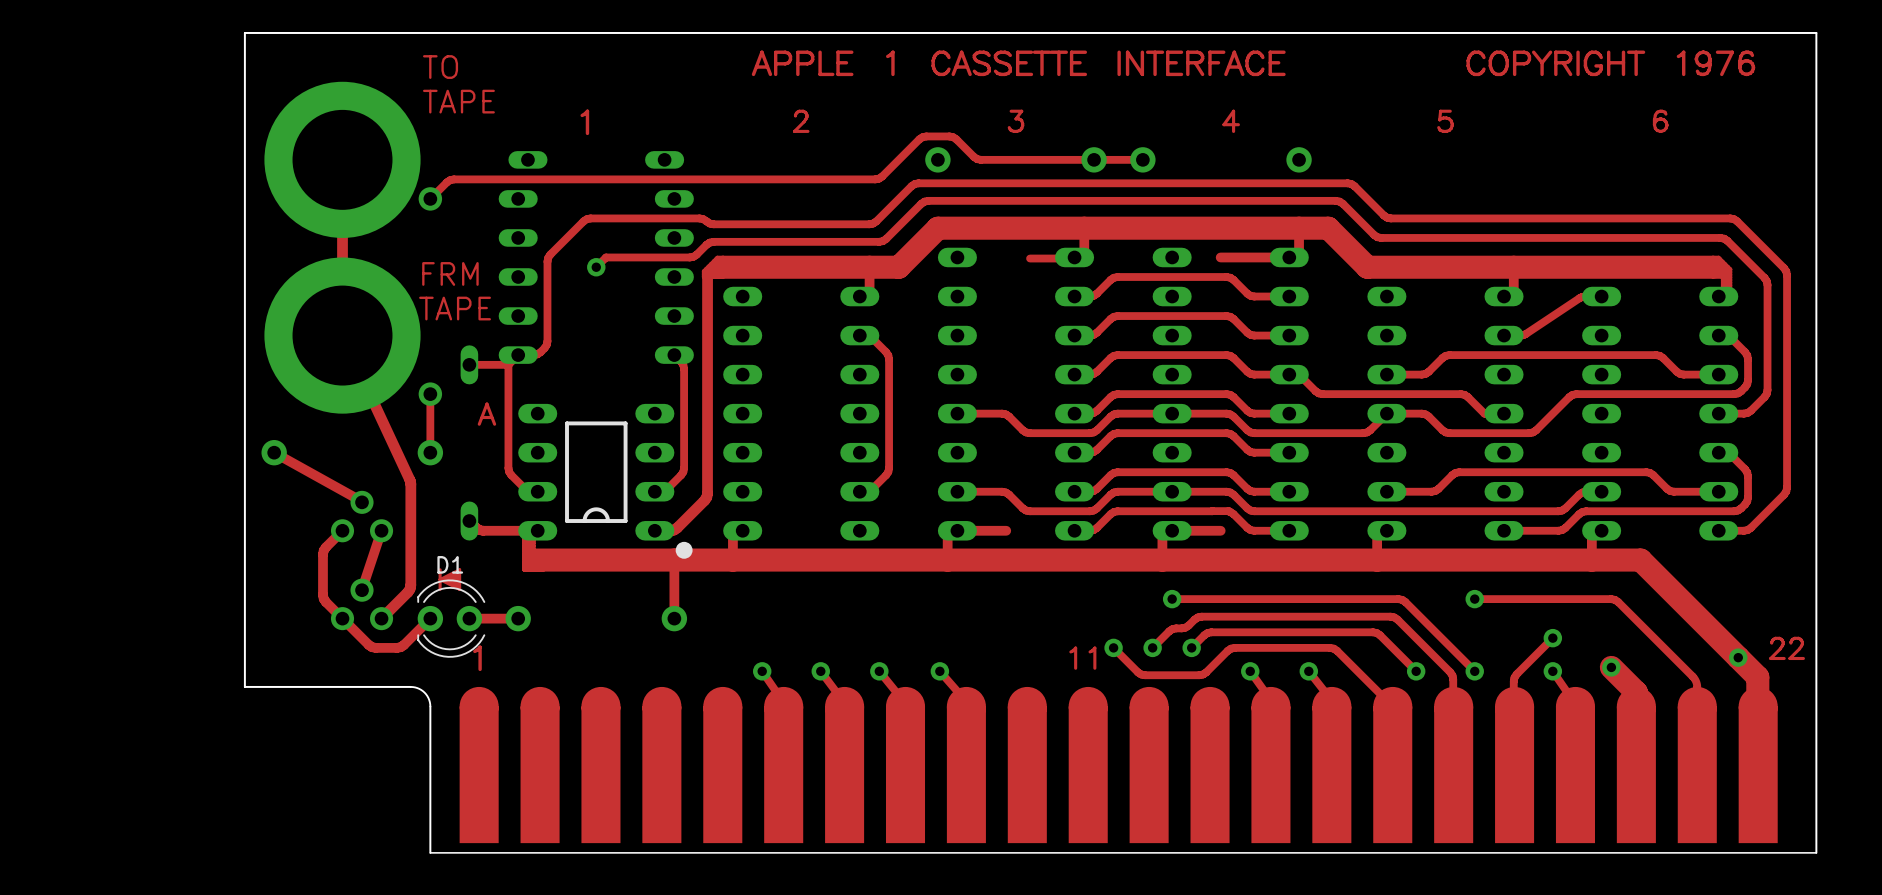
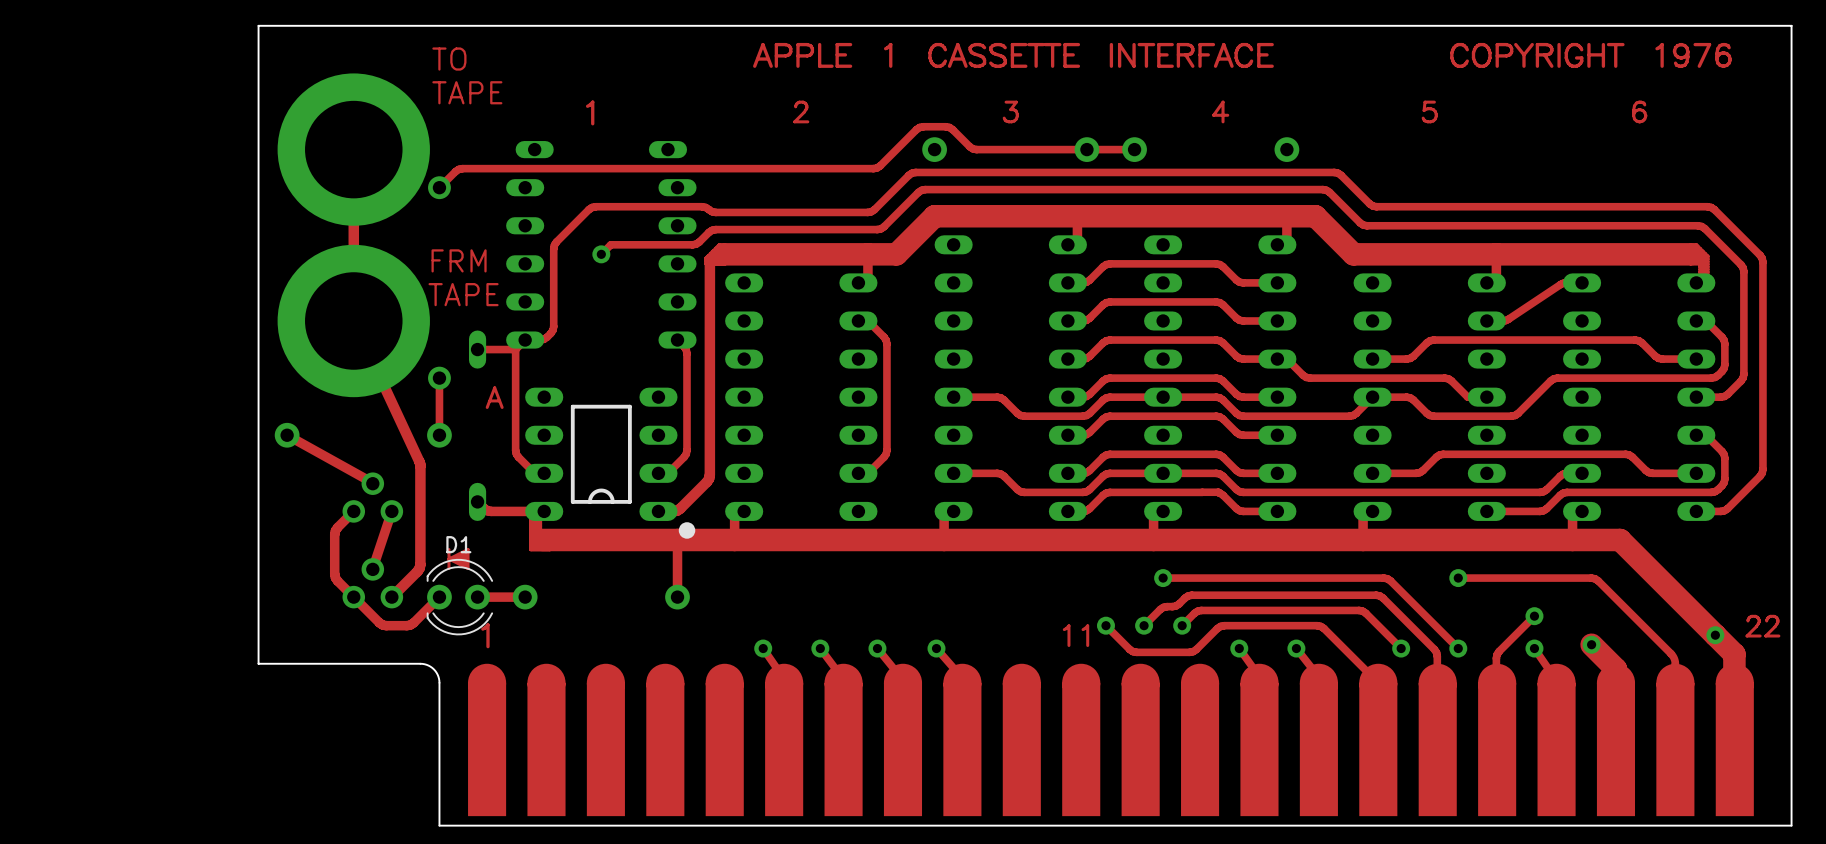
track: (1074, 257) (1030, 258) -> none
track: (1220, 257) (1289, 257) -> none
track: (957, 530) (1006, 530) -> none
track: (1172, 530) (1220, 530) -> none

